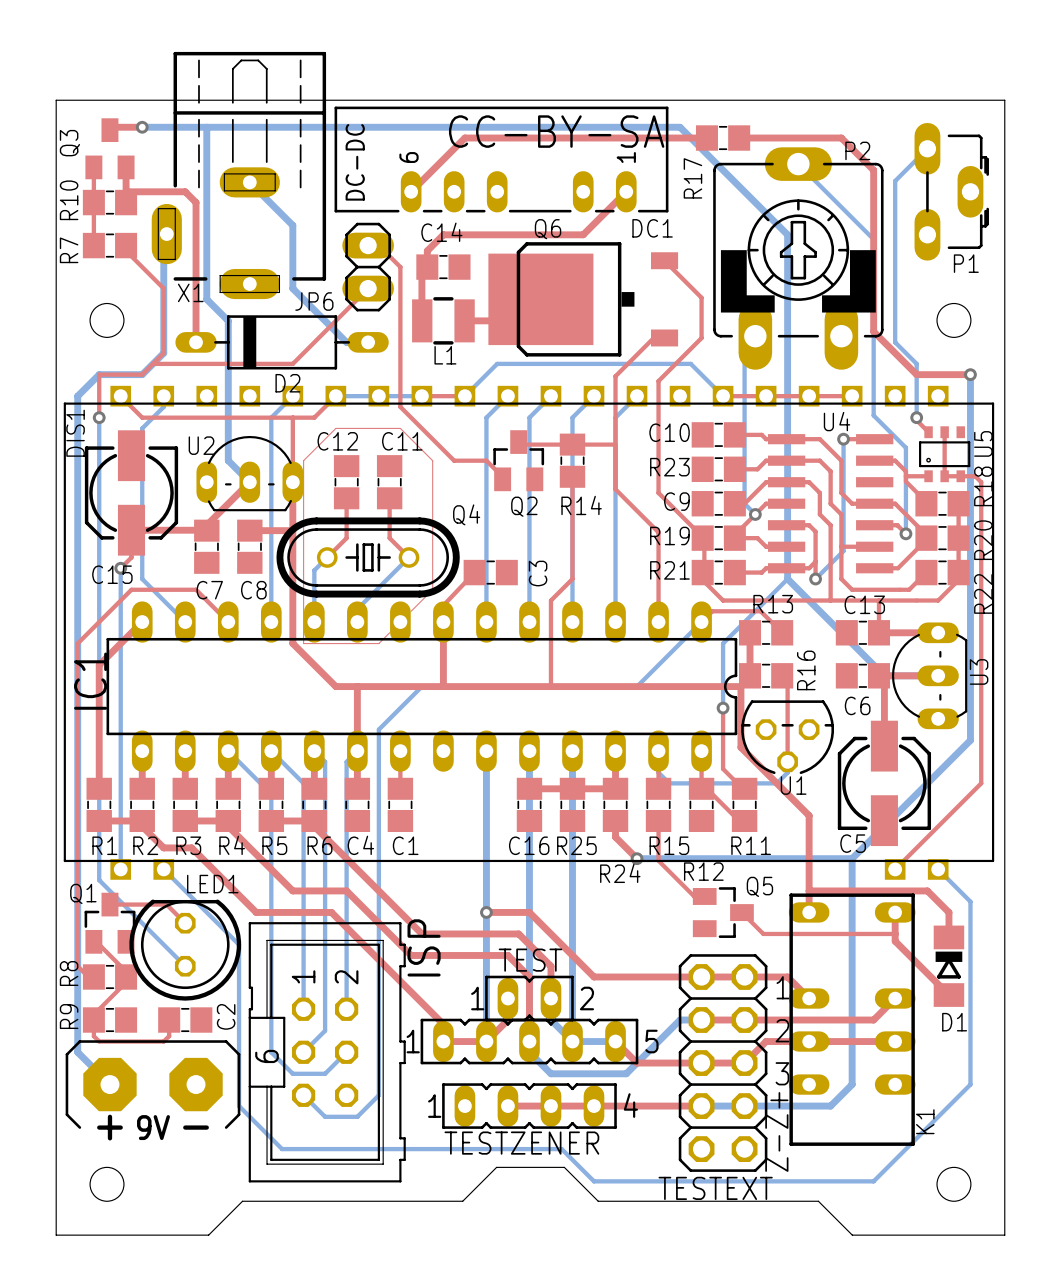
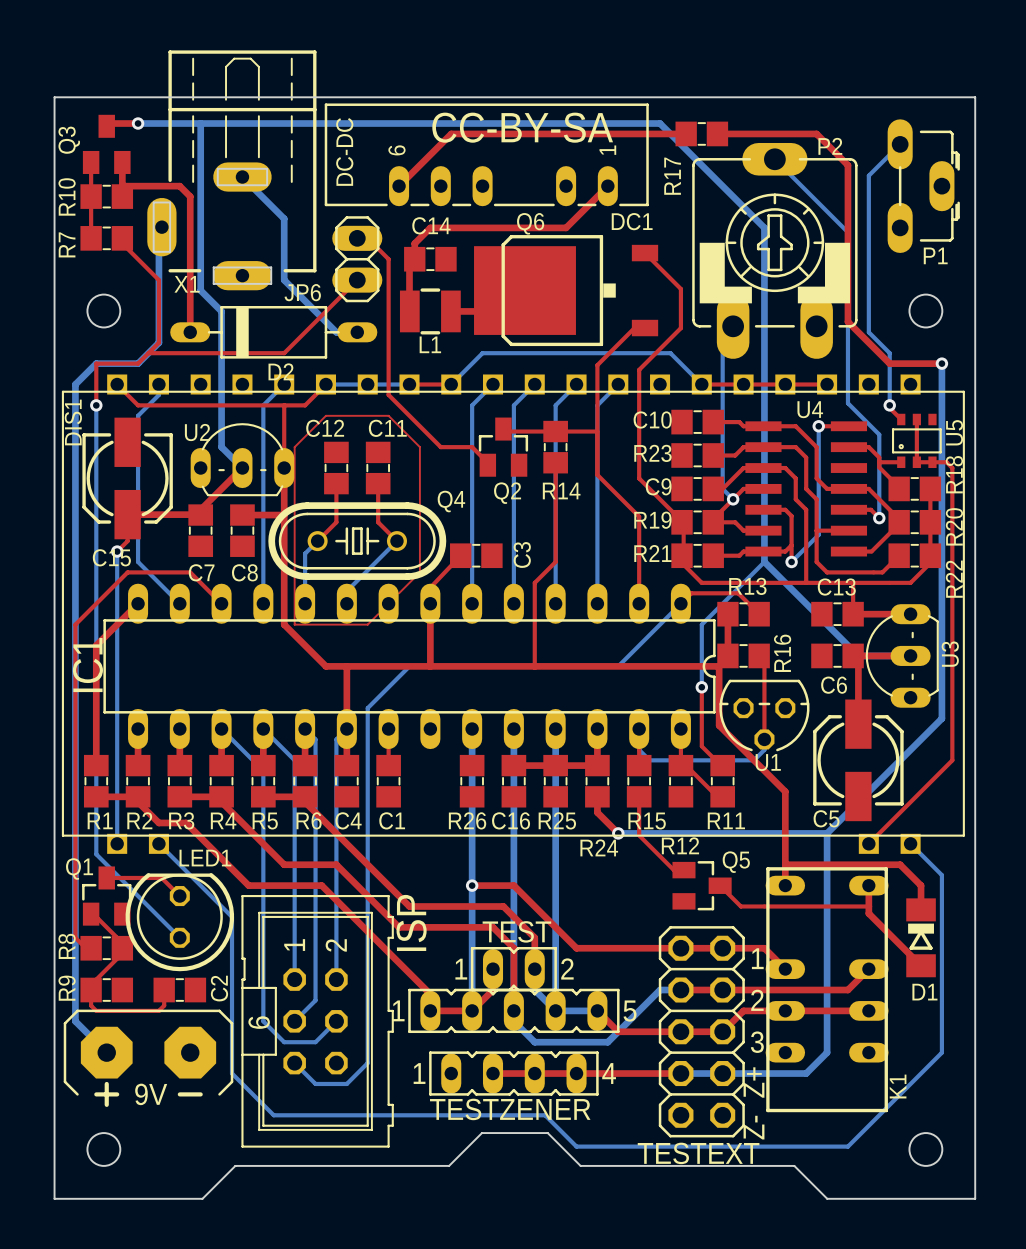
R26: none -> (472, 781)

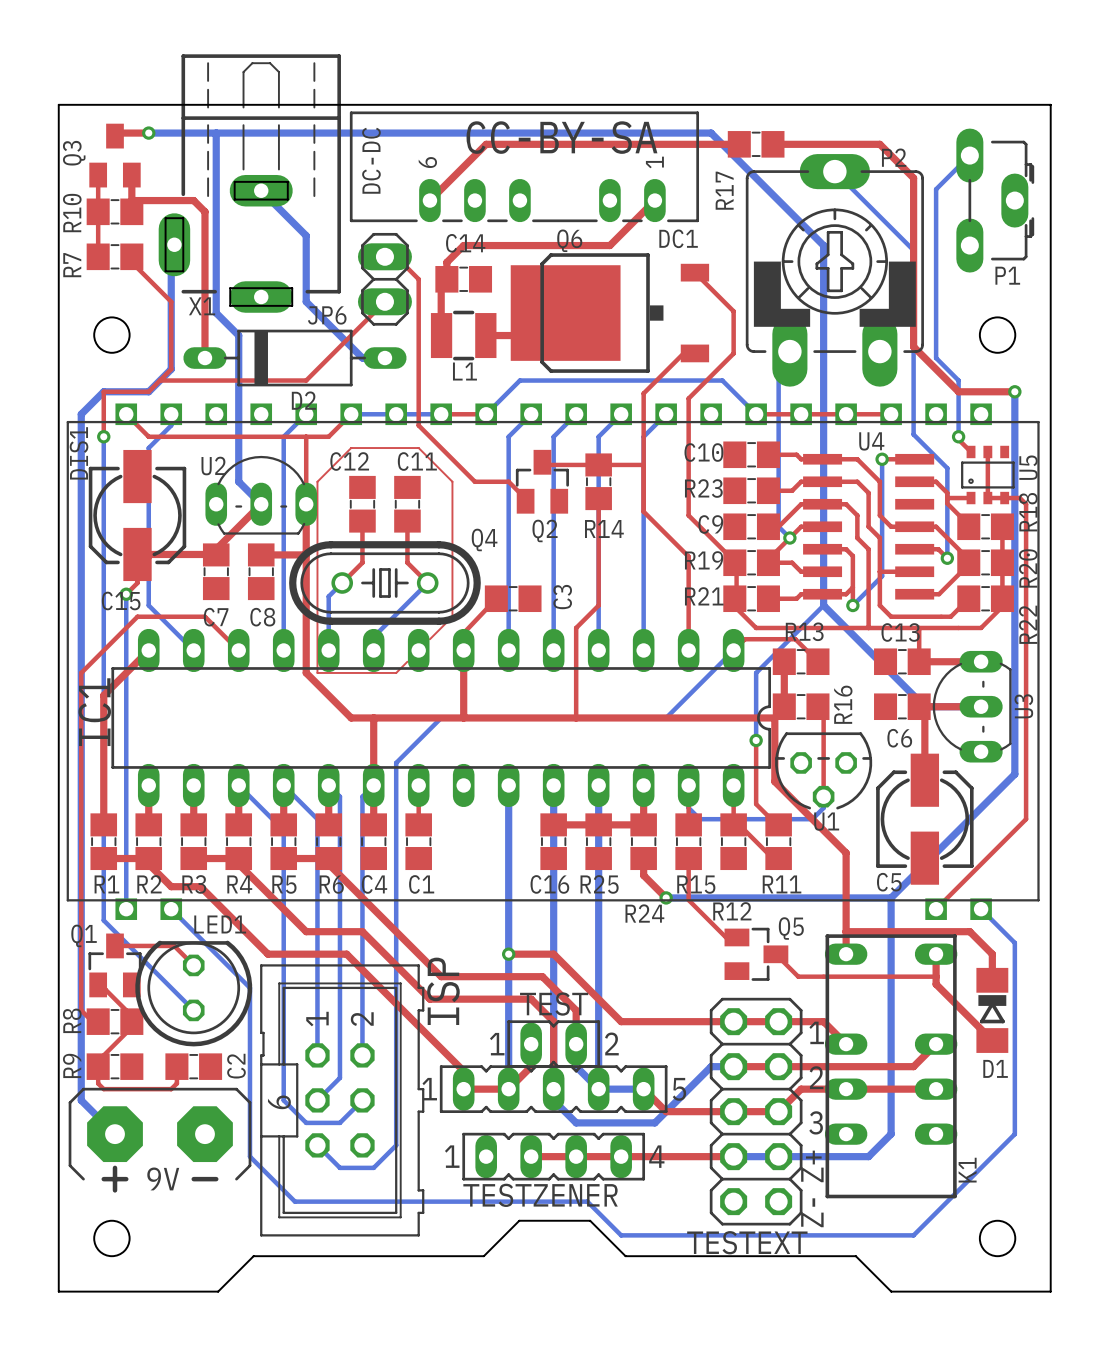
R26: (472, 781) -> none

